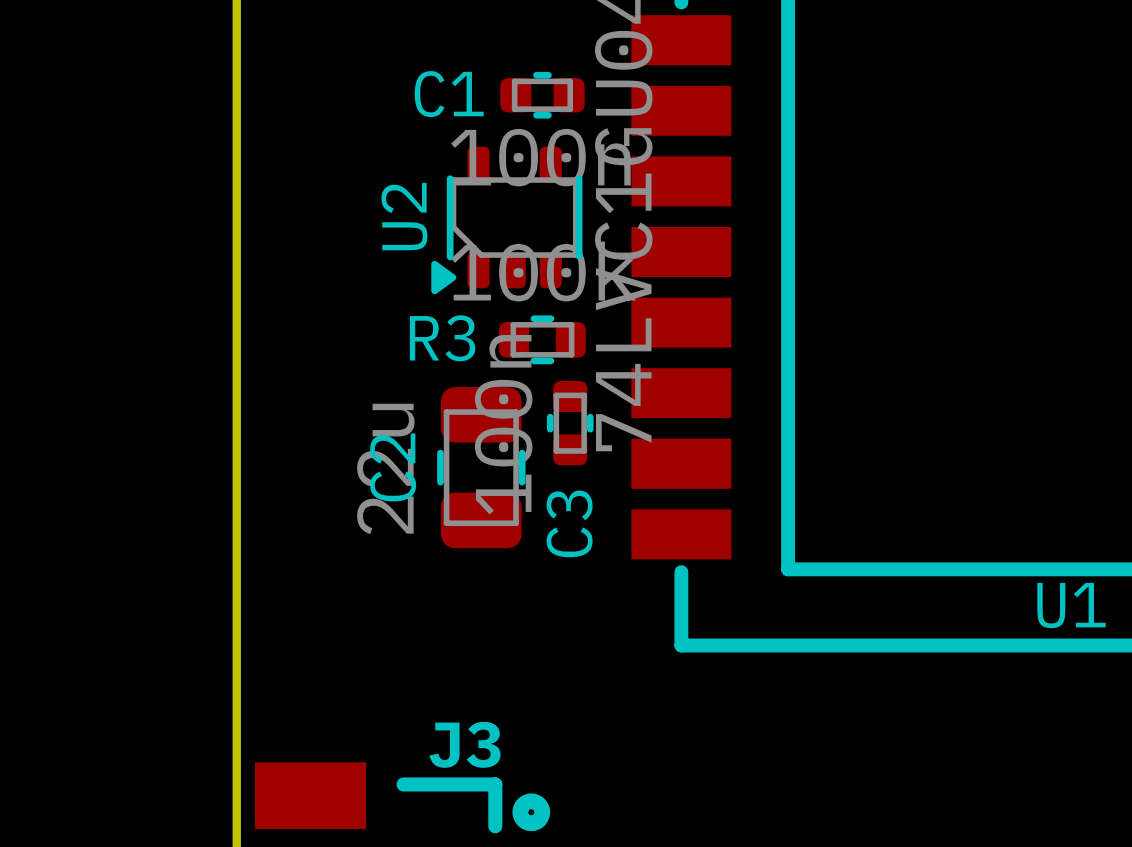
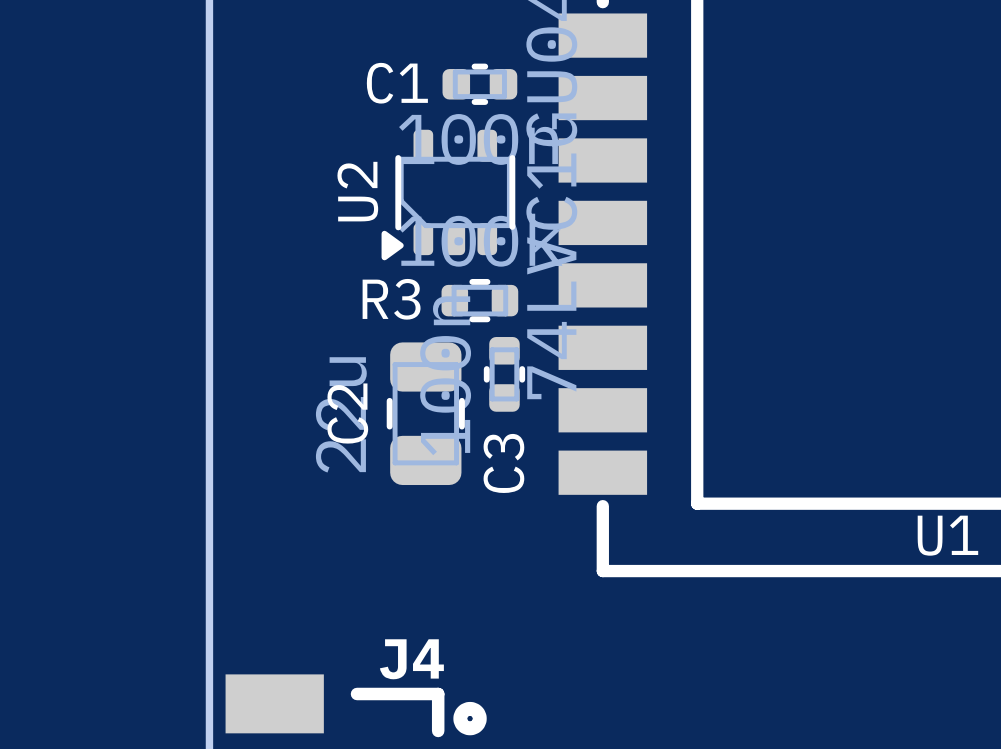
J3 name: J3 (465, 744) -> J4 (411, 659)

